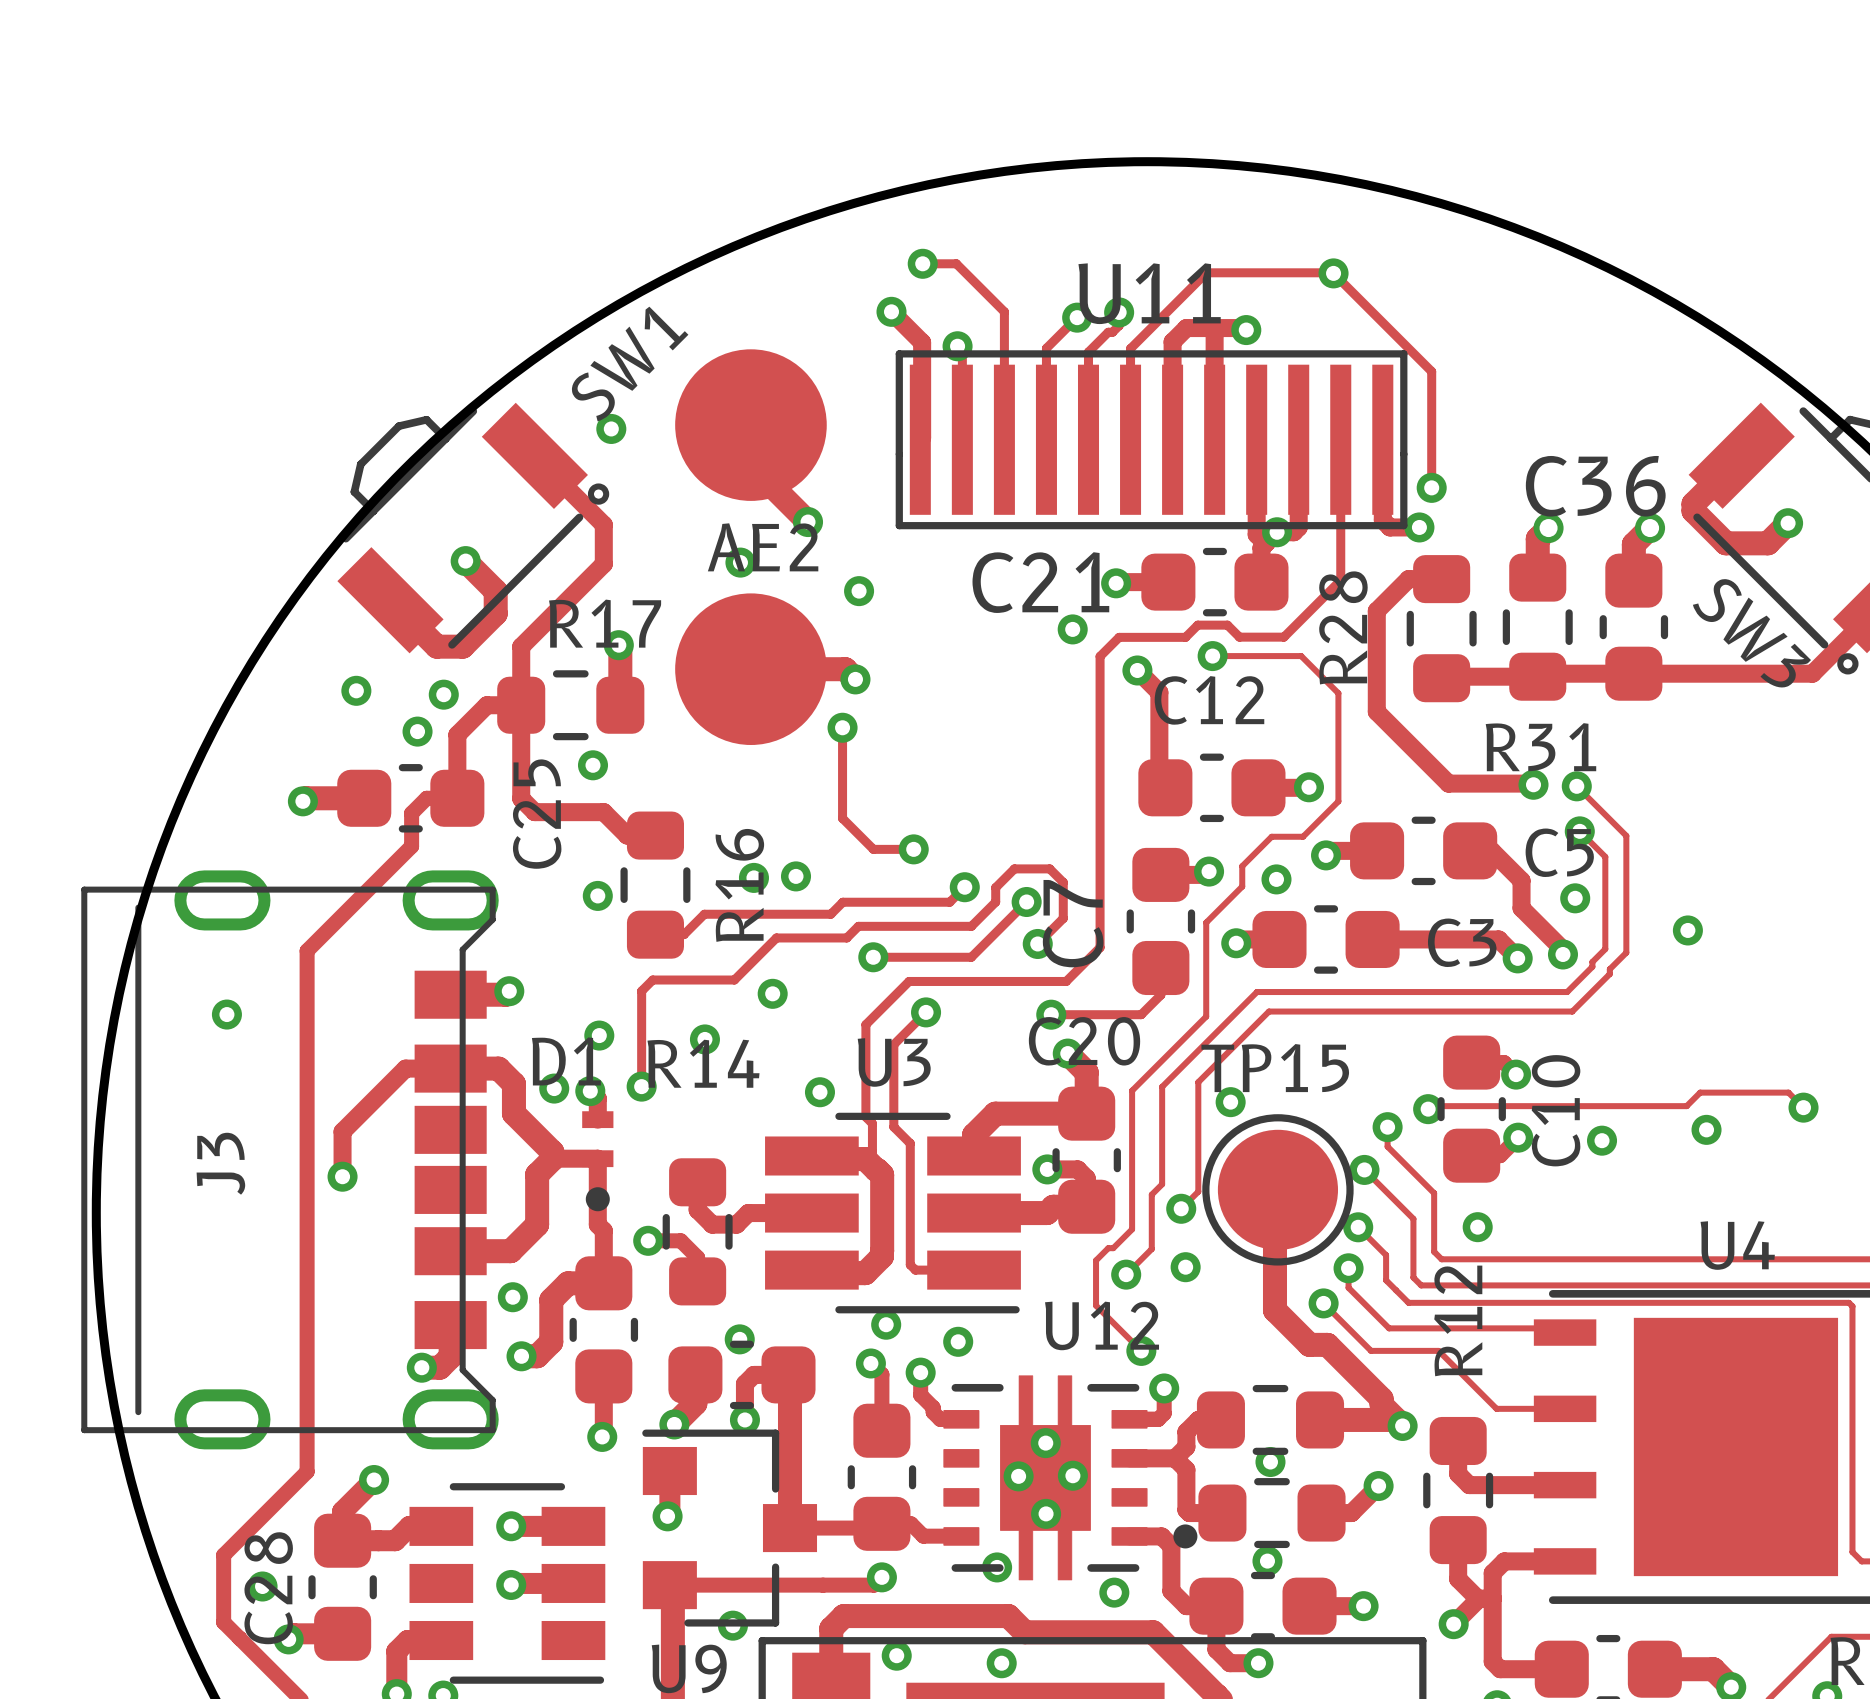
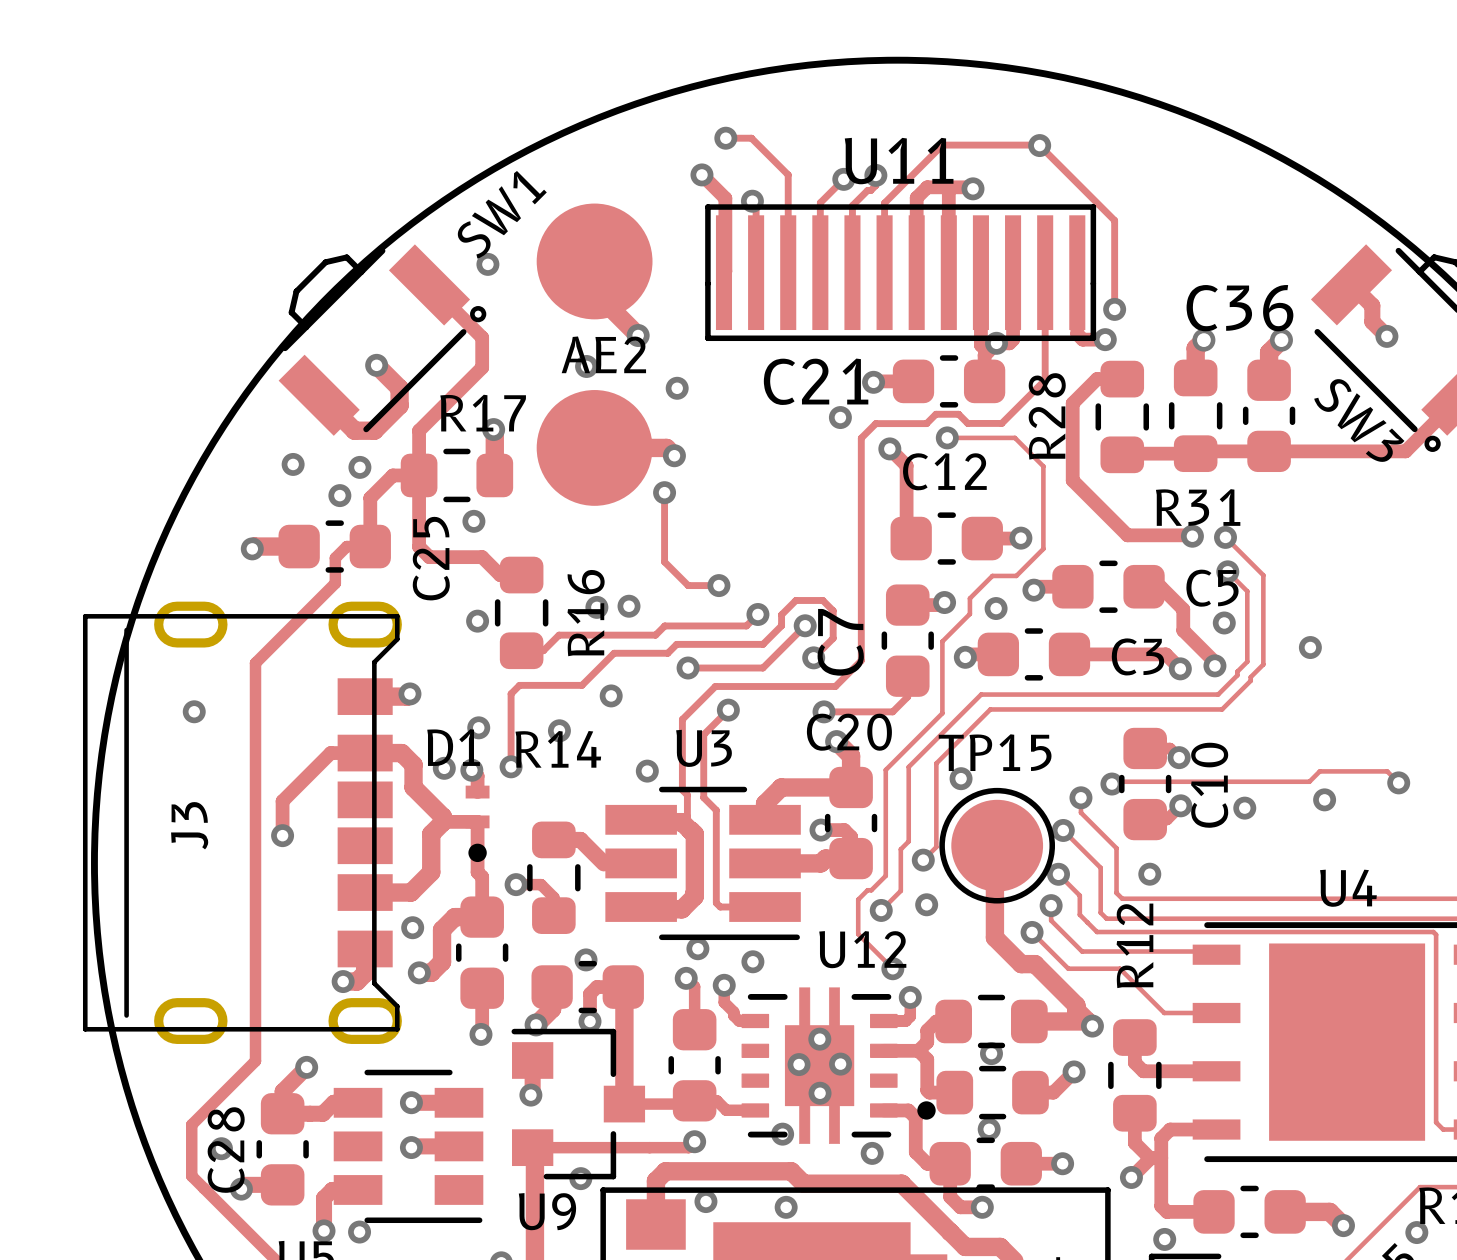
track: (1741, 455) (1693, 503) (1693, 511) (1725, 543) (1767, 543) (1788, 523) -> (1351, 284) (1372, 305) (1372, 321) (1386, 336)
track: (697, 1182) (697, 1210) (712, 1224) (736, 1224) (748, 1213) (763, 1213) -> (553, 839) (580, 839) (604, 863)

